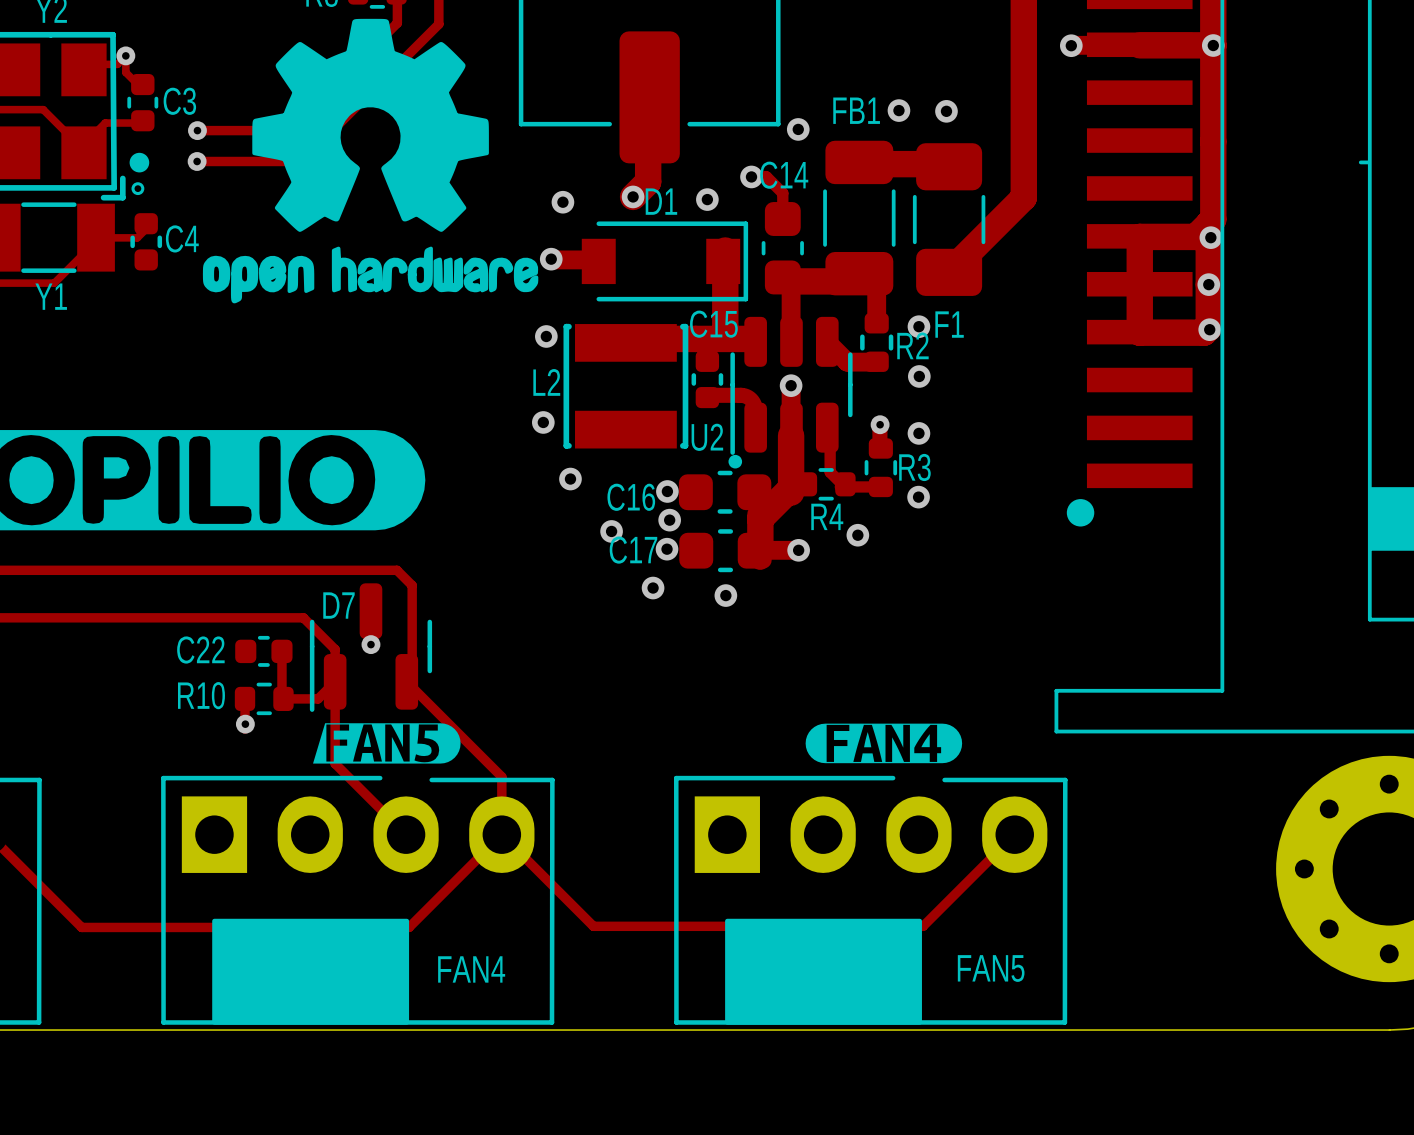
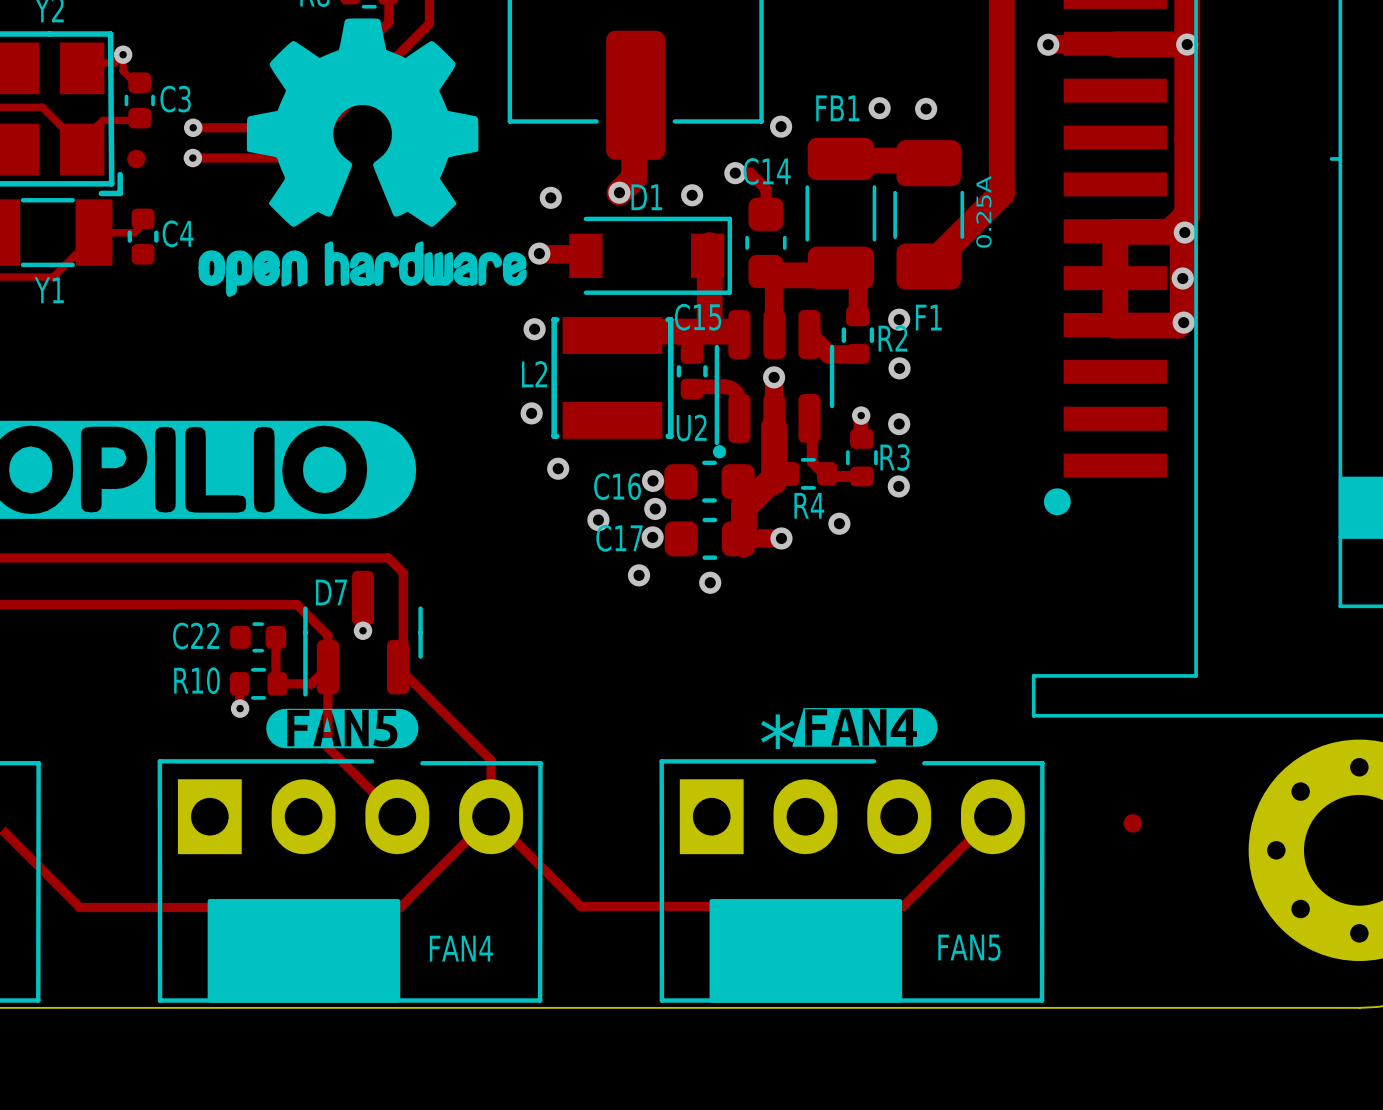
drawing: [129, 152, 150, 196] -> none
part: none -> (136, 159)
text: none -> 0.25A (983, 211)
drawing shape: [313, 723, 461, 764] -> [266, 708, 419, 749]
drawing shape: [805, 723, 963, 764] -> [792, 708, 938, 747]
text: none -> * (777, 731)
part: none -> (1132, 823)

